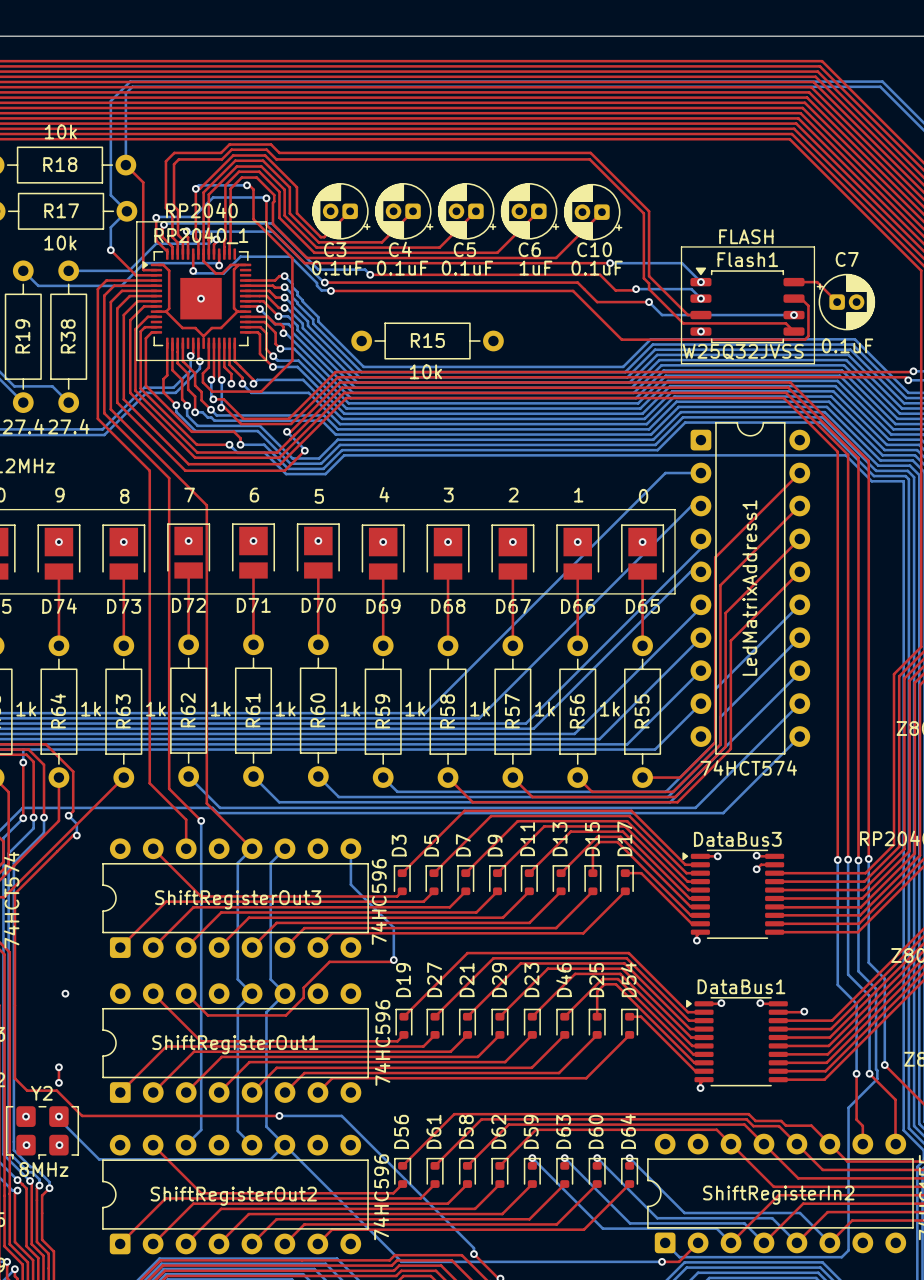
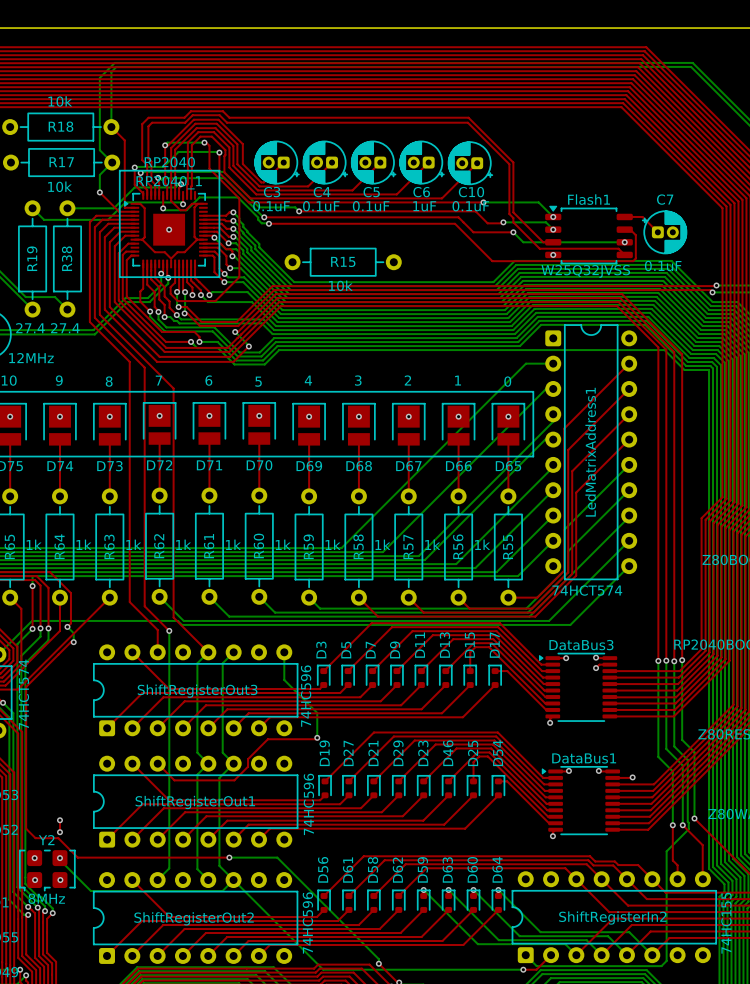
text: FLASH (746, 236) -> none
line: (681, 246) (814, 246) (814, 363) (681, 363) (681, 246) -> none
via: (65, 993) -> none

